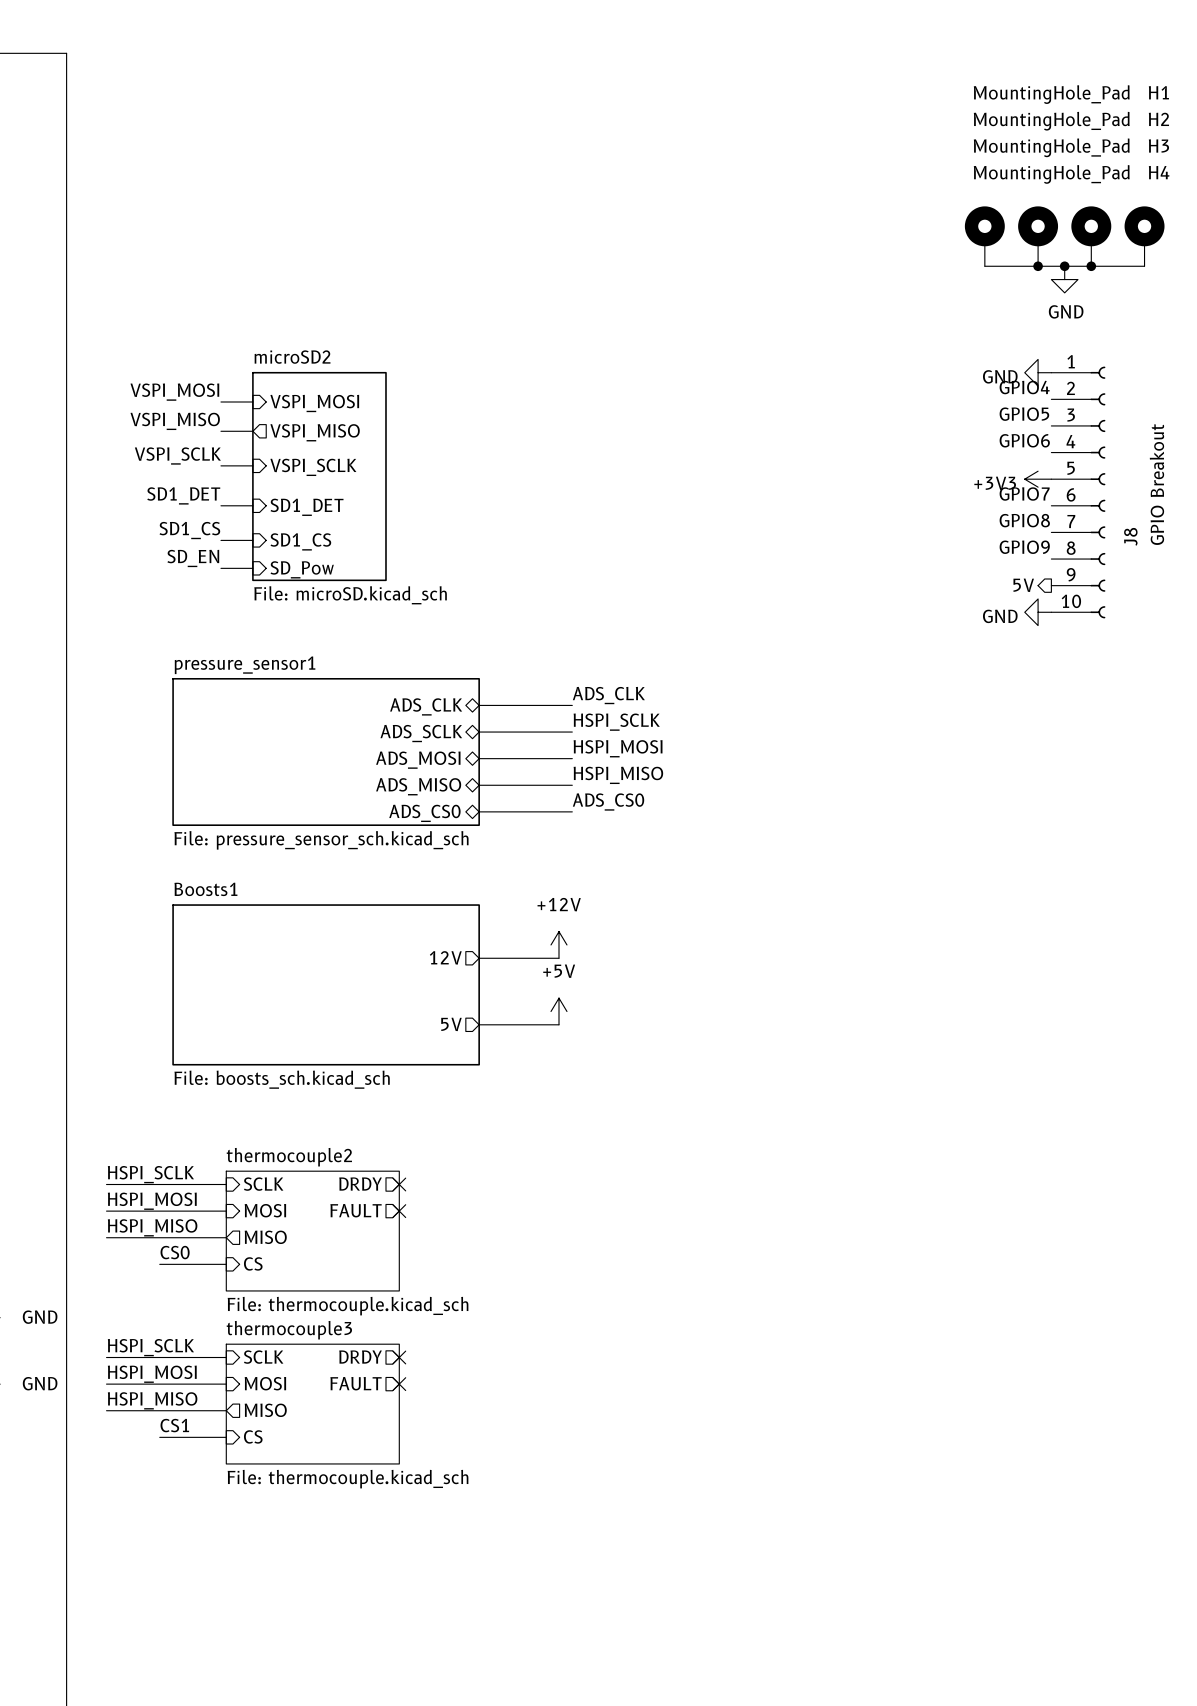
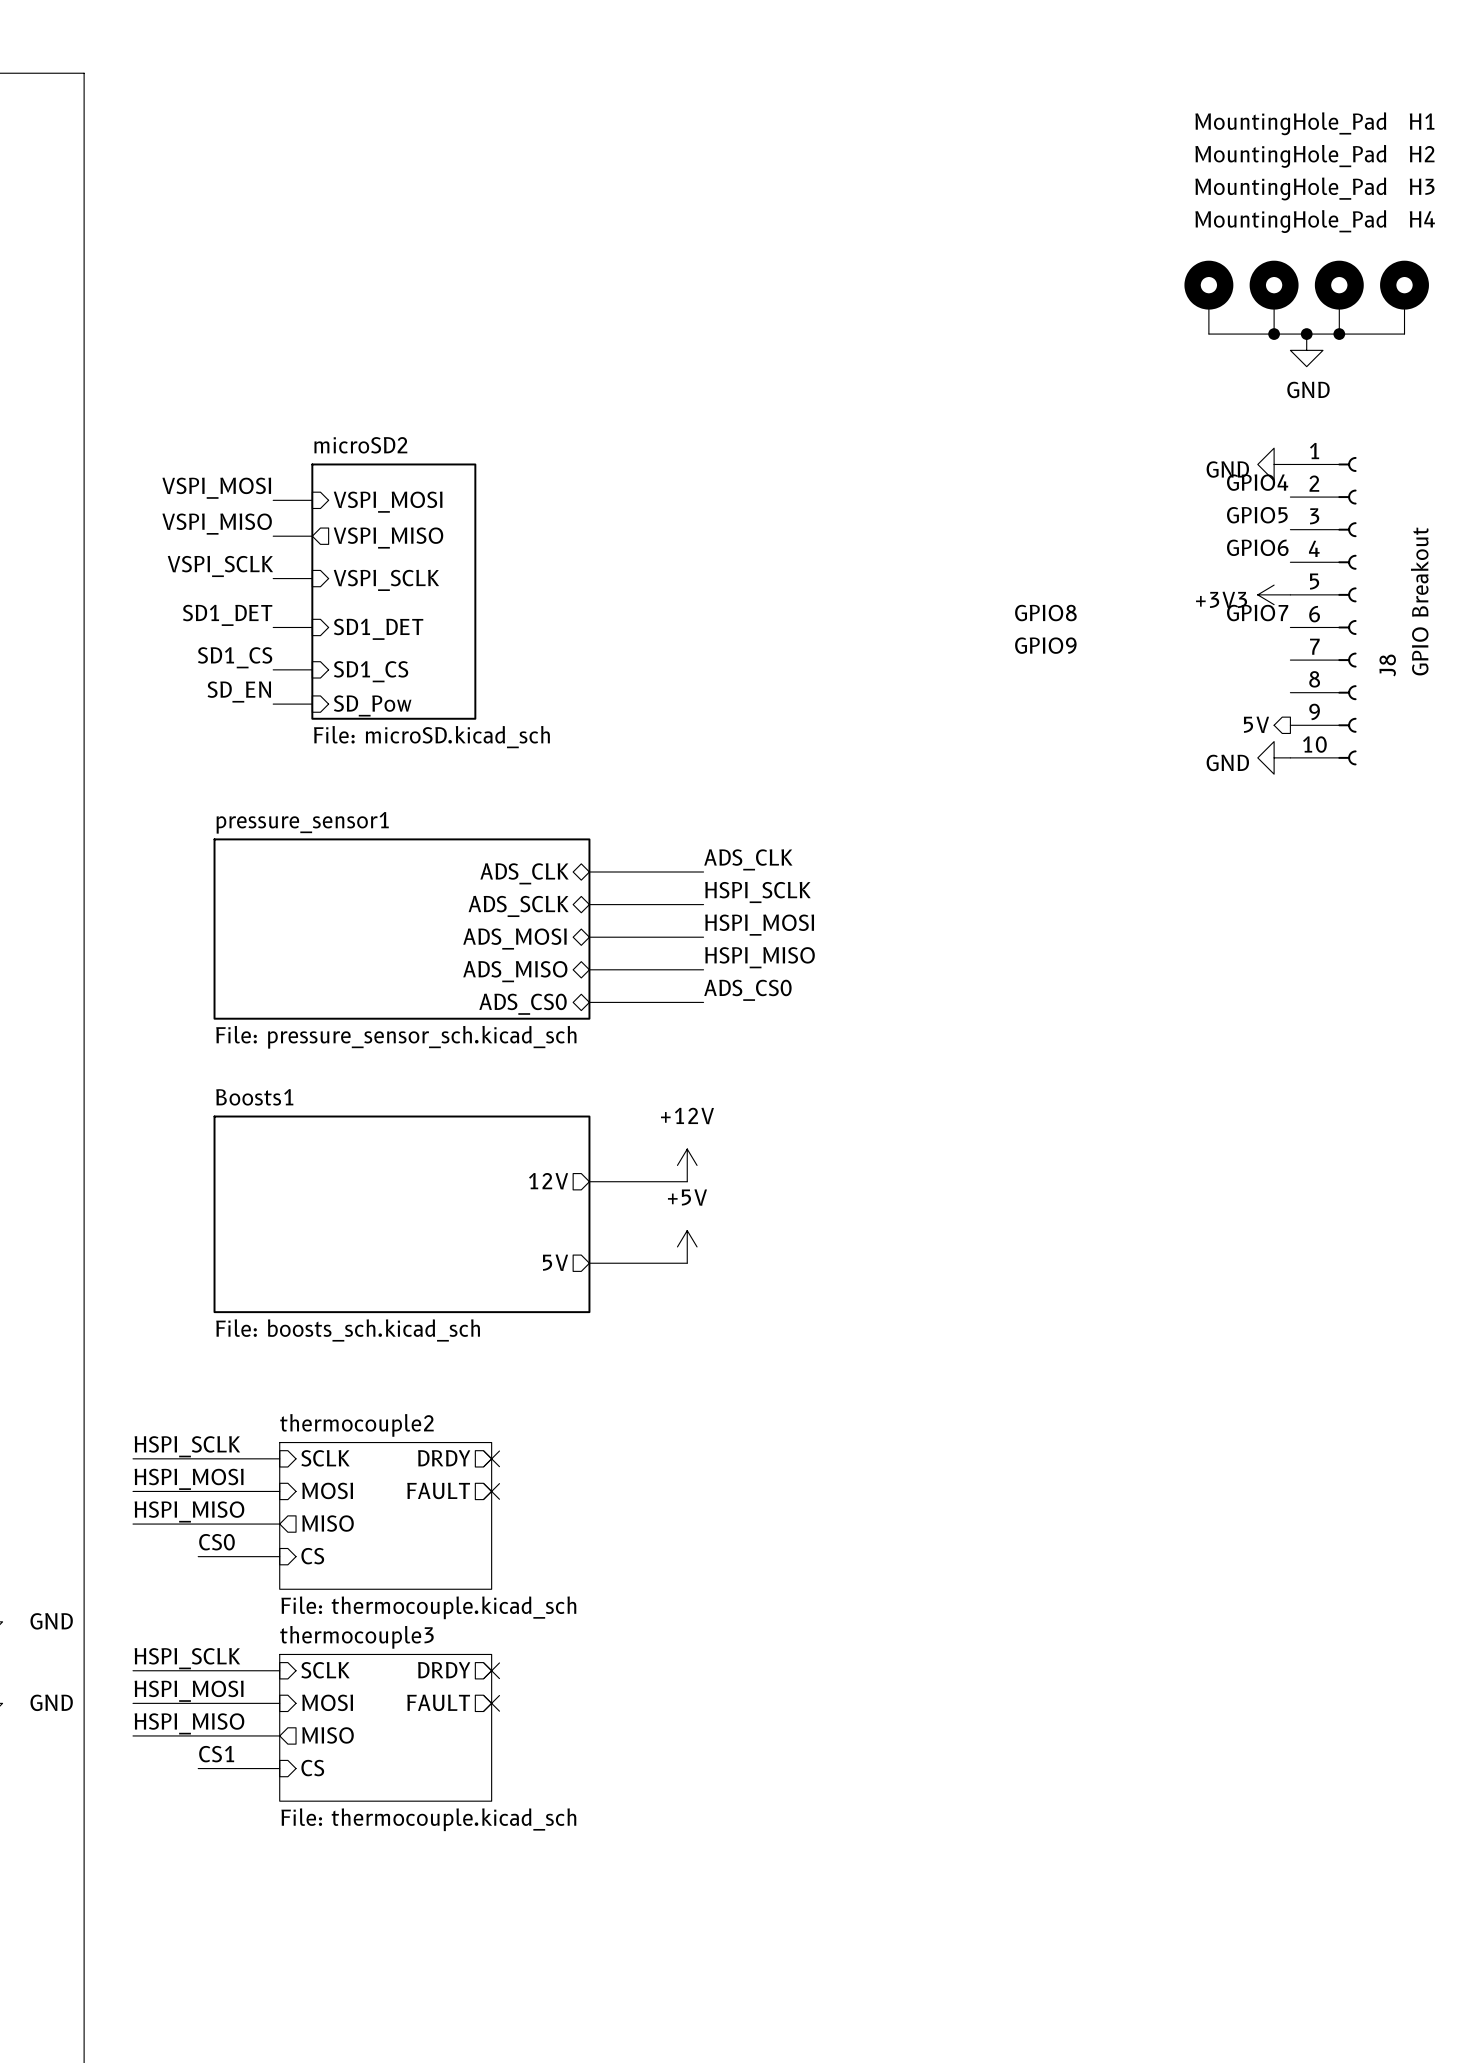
label position: GPIO8 (1024, 520) -> GPIO8 (1045, 613)
label position: GPIO9 (1024, 547) -> GPIO9 (1045, 645)

